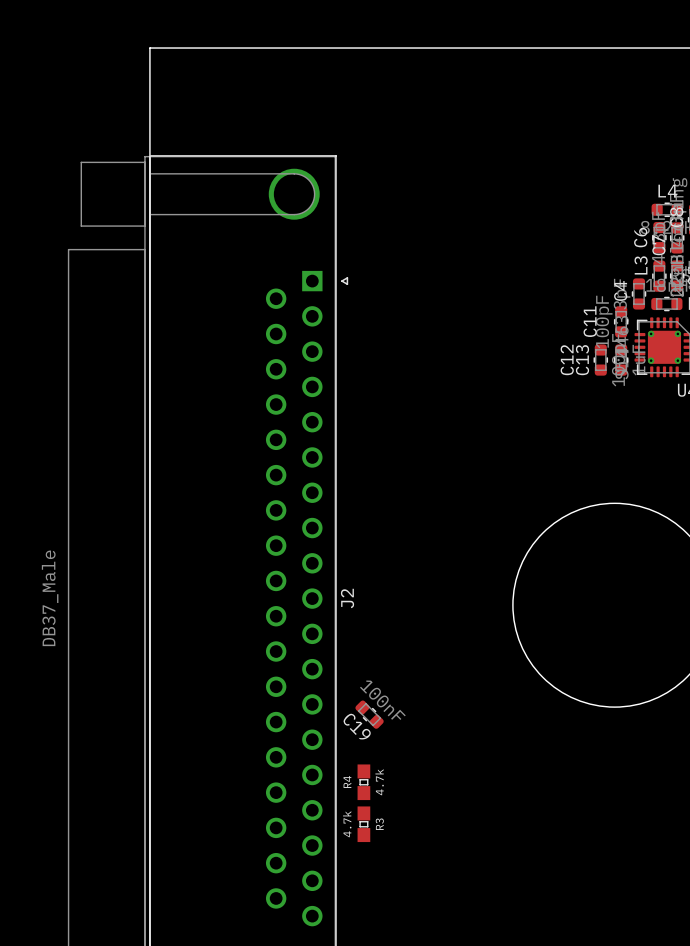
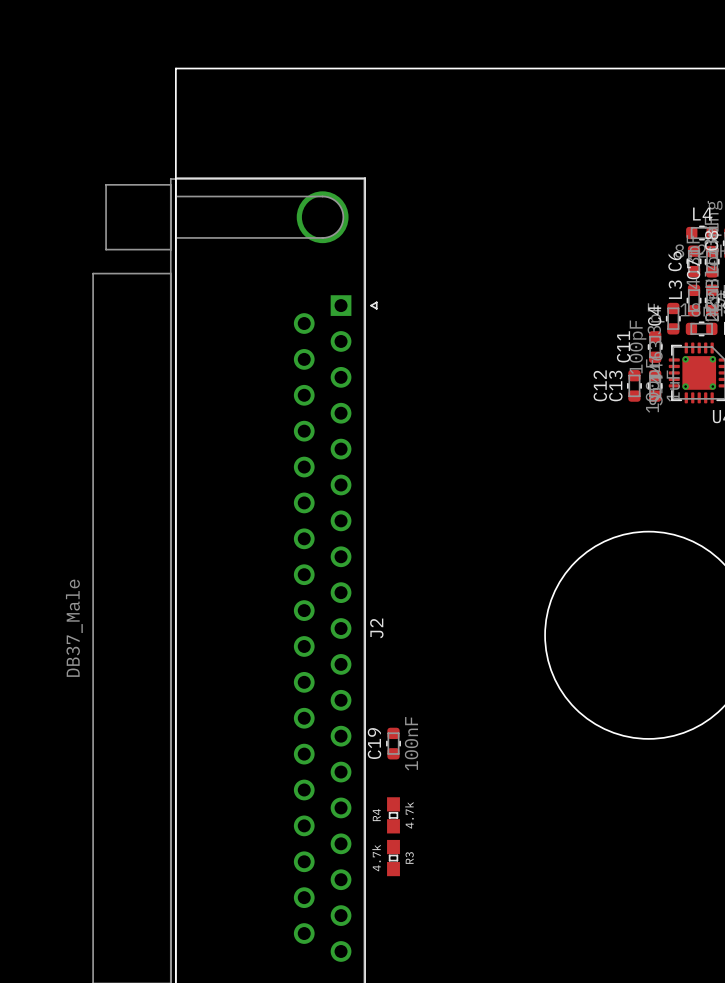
C19 rotation: 0° (369, 714) -> 45° clockwise (393, 743)

